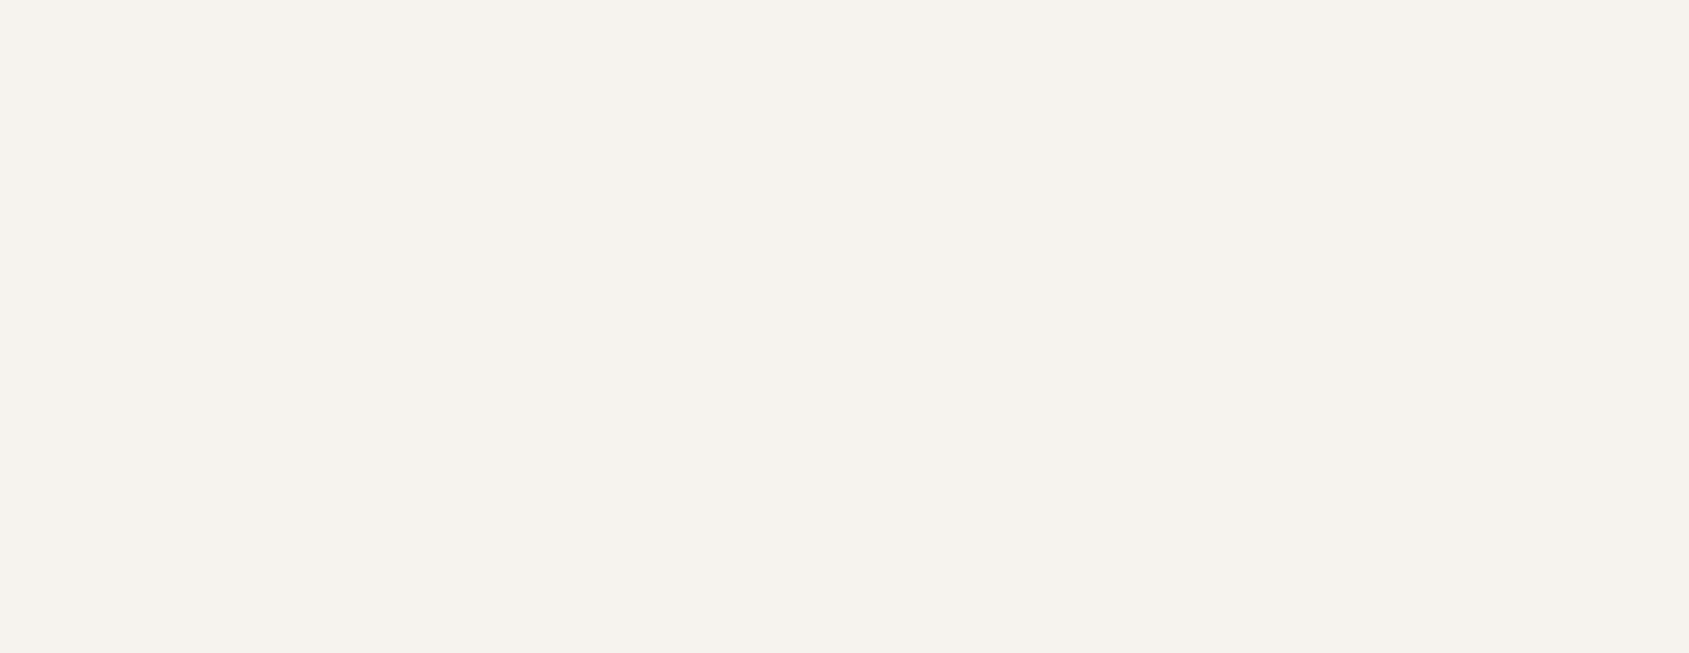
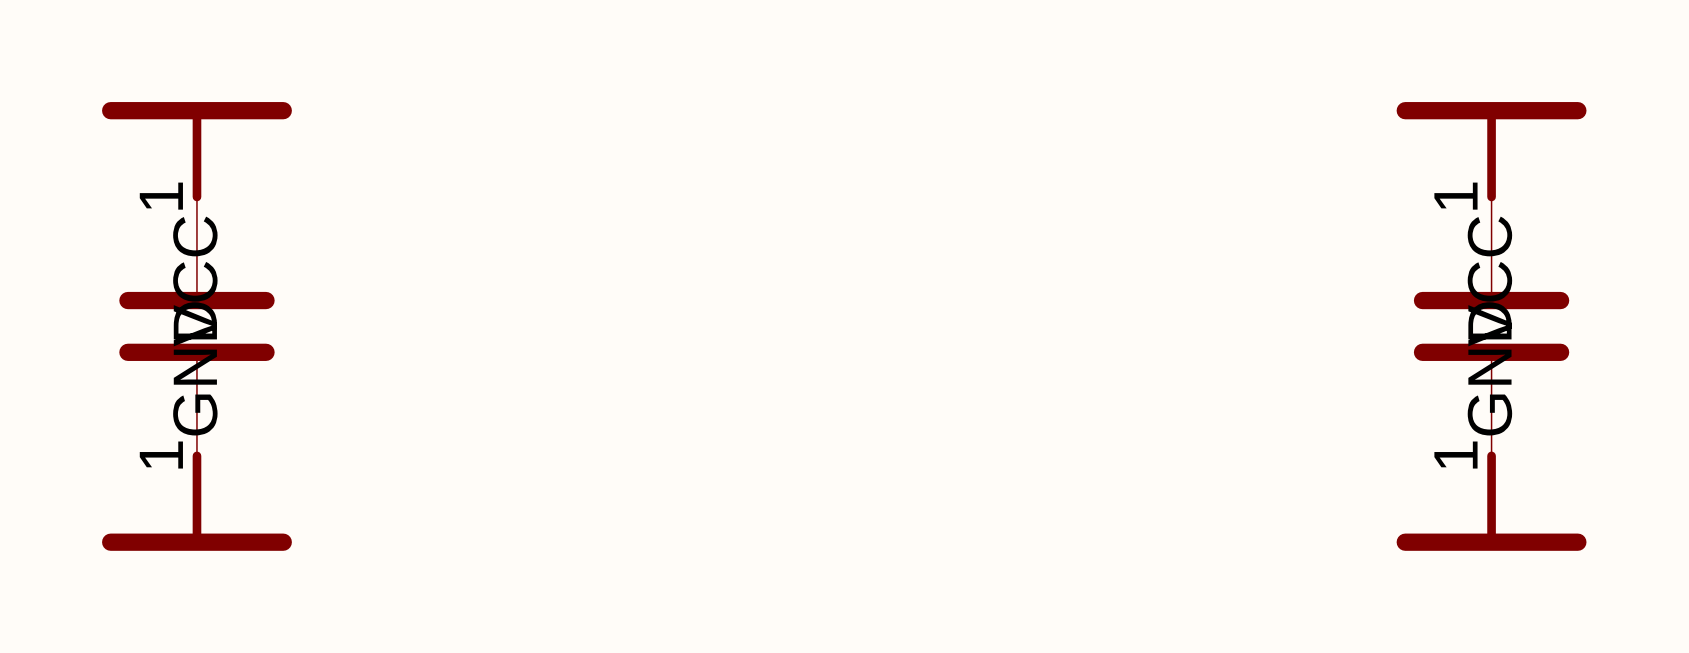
power symbol: none -> (196, 151)
power symbol: none -> (1491, 151)
part: none -> (196, 326)
part: none -> (1491, 326)
power symbol: none -> (196, 501)
power symbol: none -> (1491, 501)

